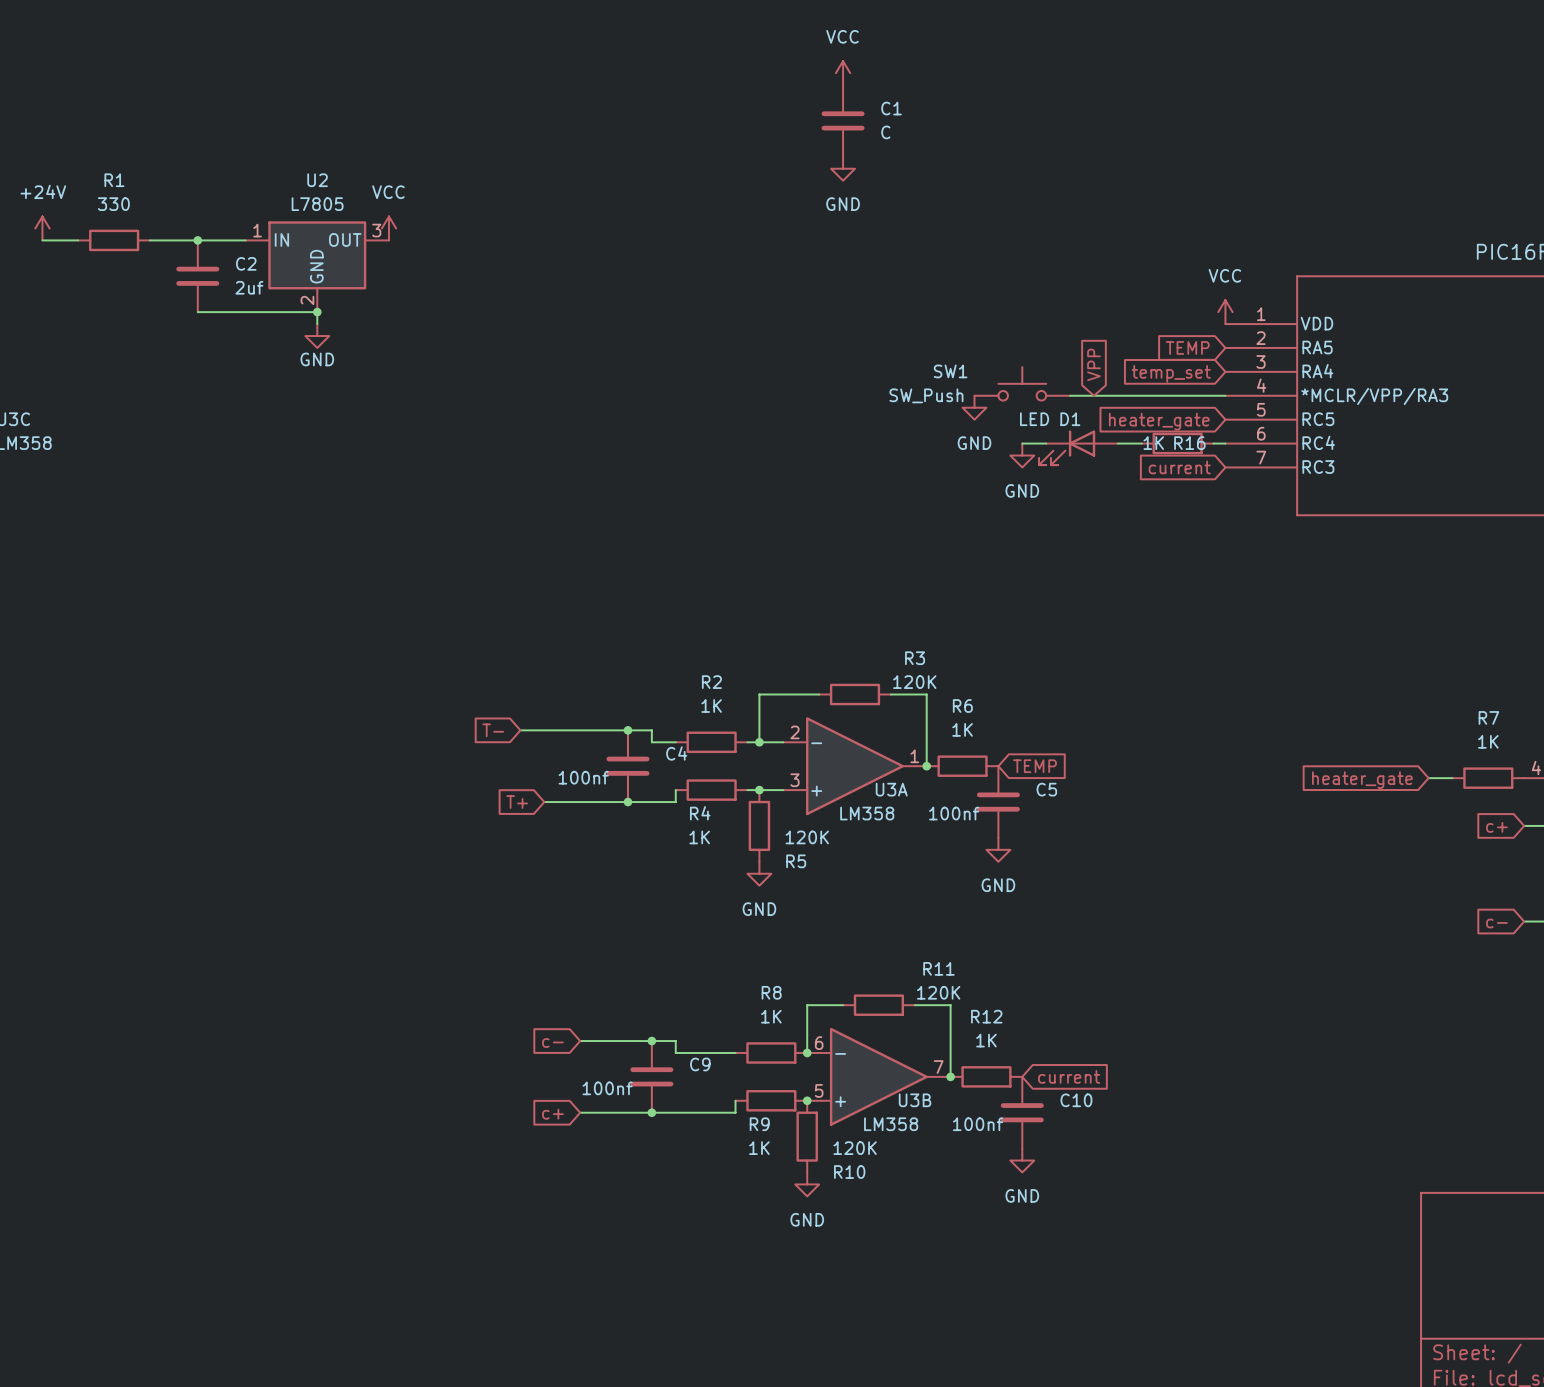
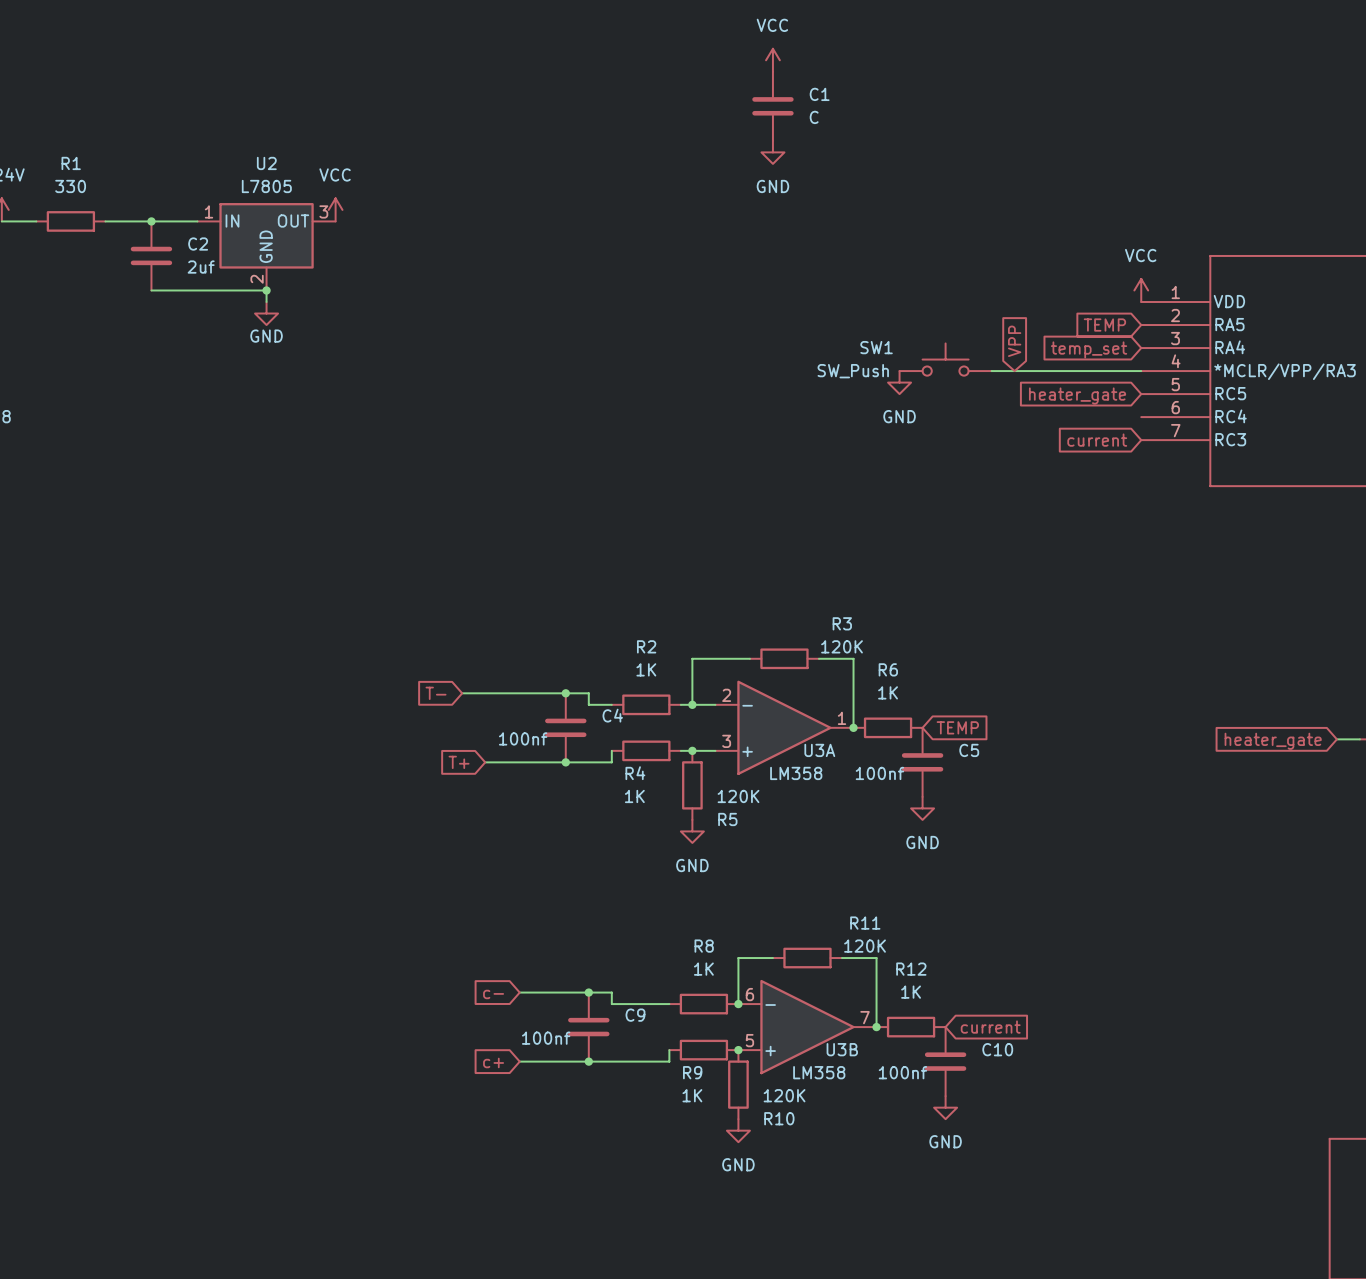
wire: (1022, 443) (1046, 443) -> none
wire: (1117, 443) (1141, 443) -> none
R16: 1K (1177, 443) -> none
wire: (1213, 443) (1225, 443) -> none
D1: LED (1078, 447) -> none
power symbol: GND (1022, 455) -> none

